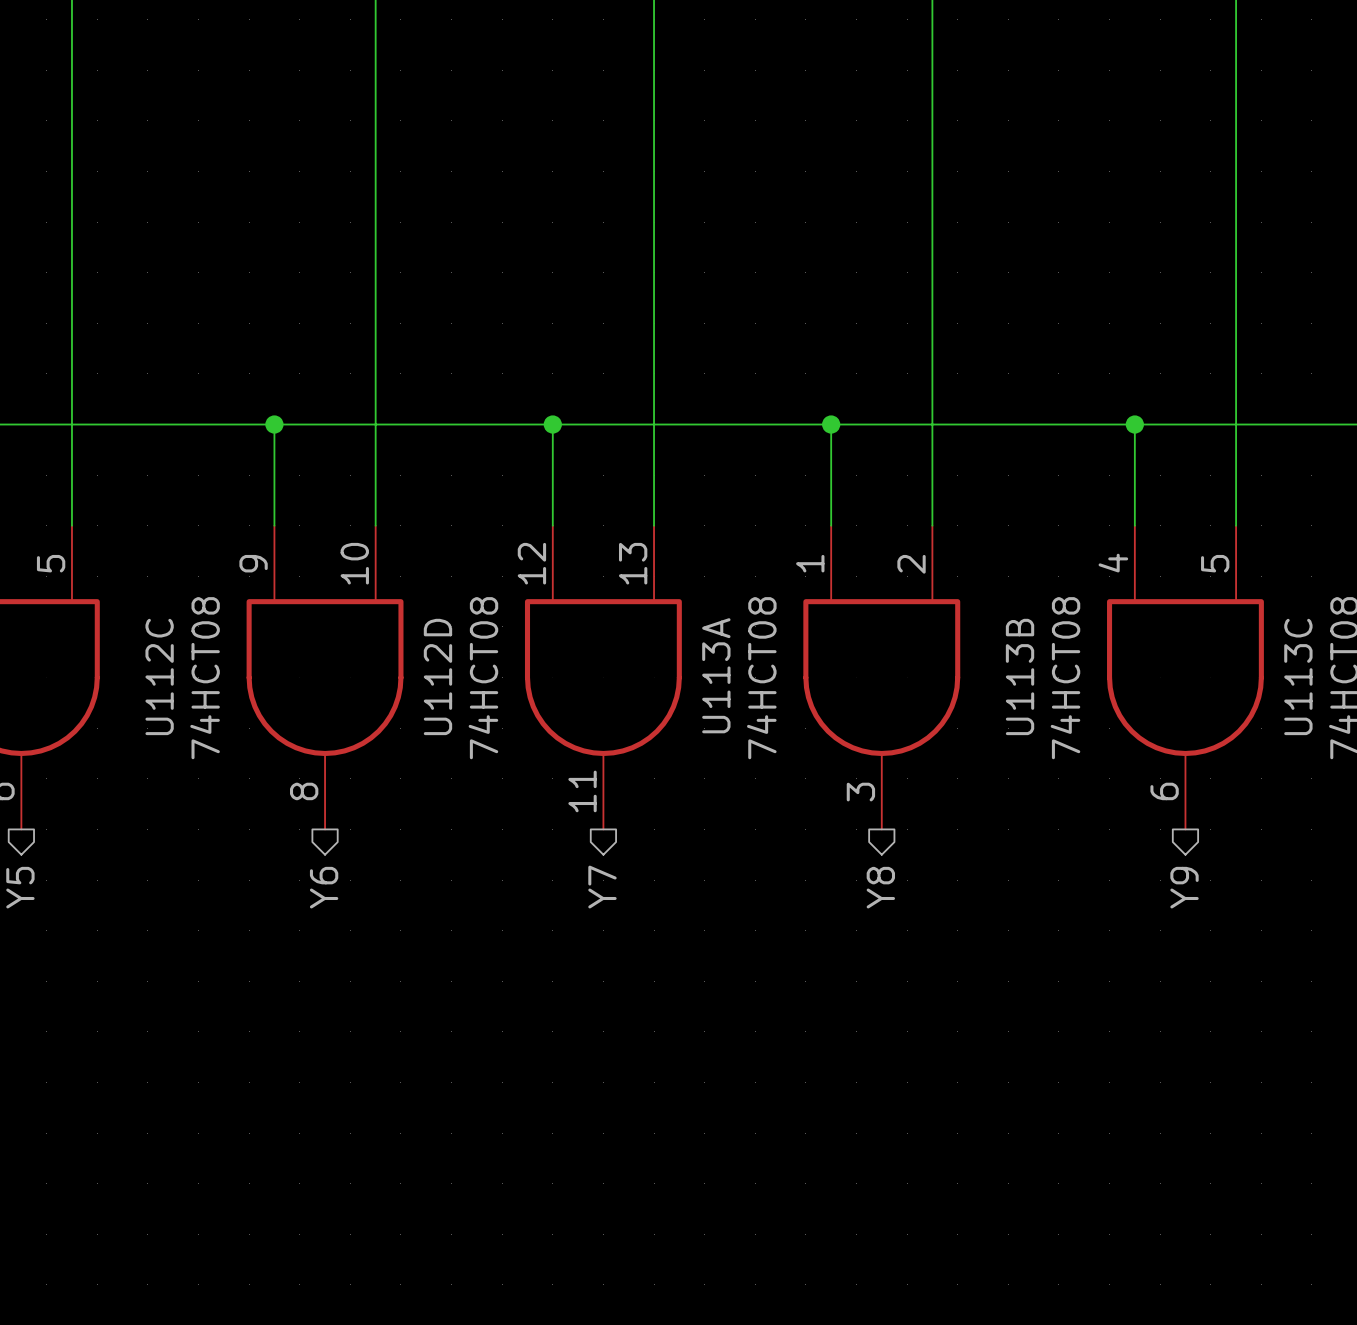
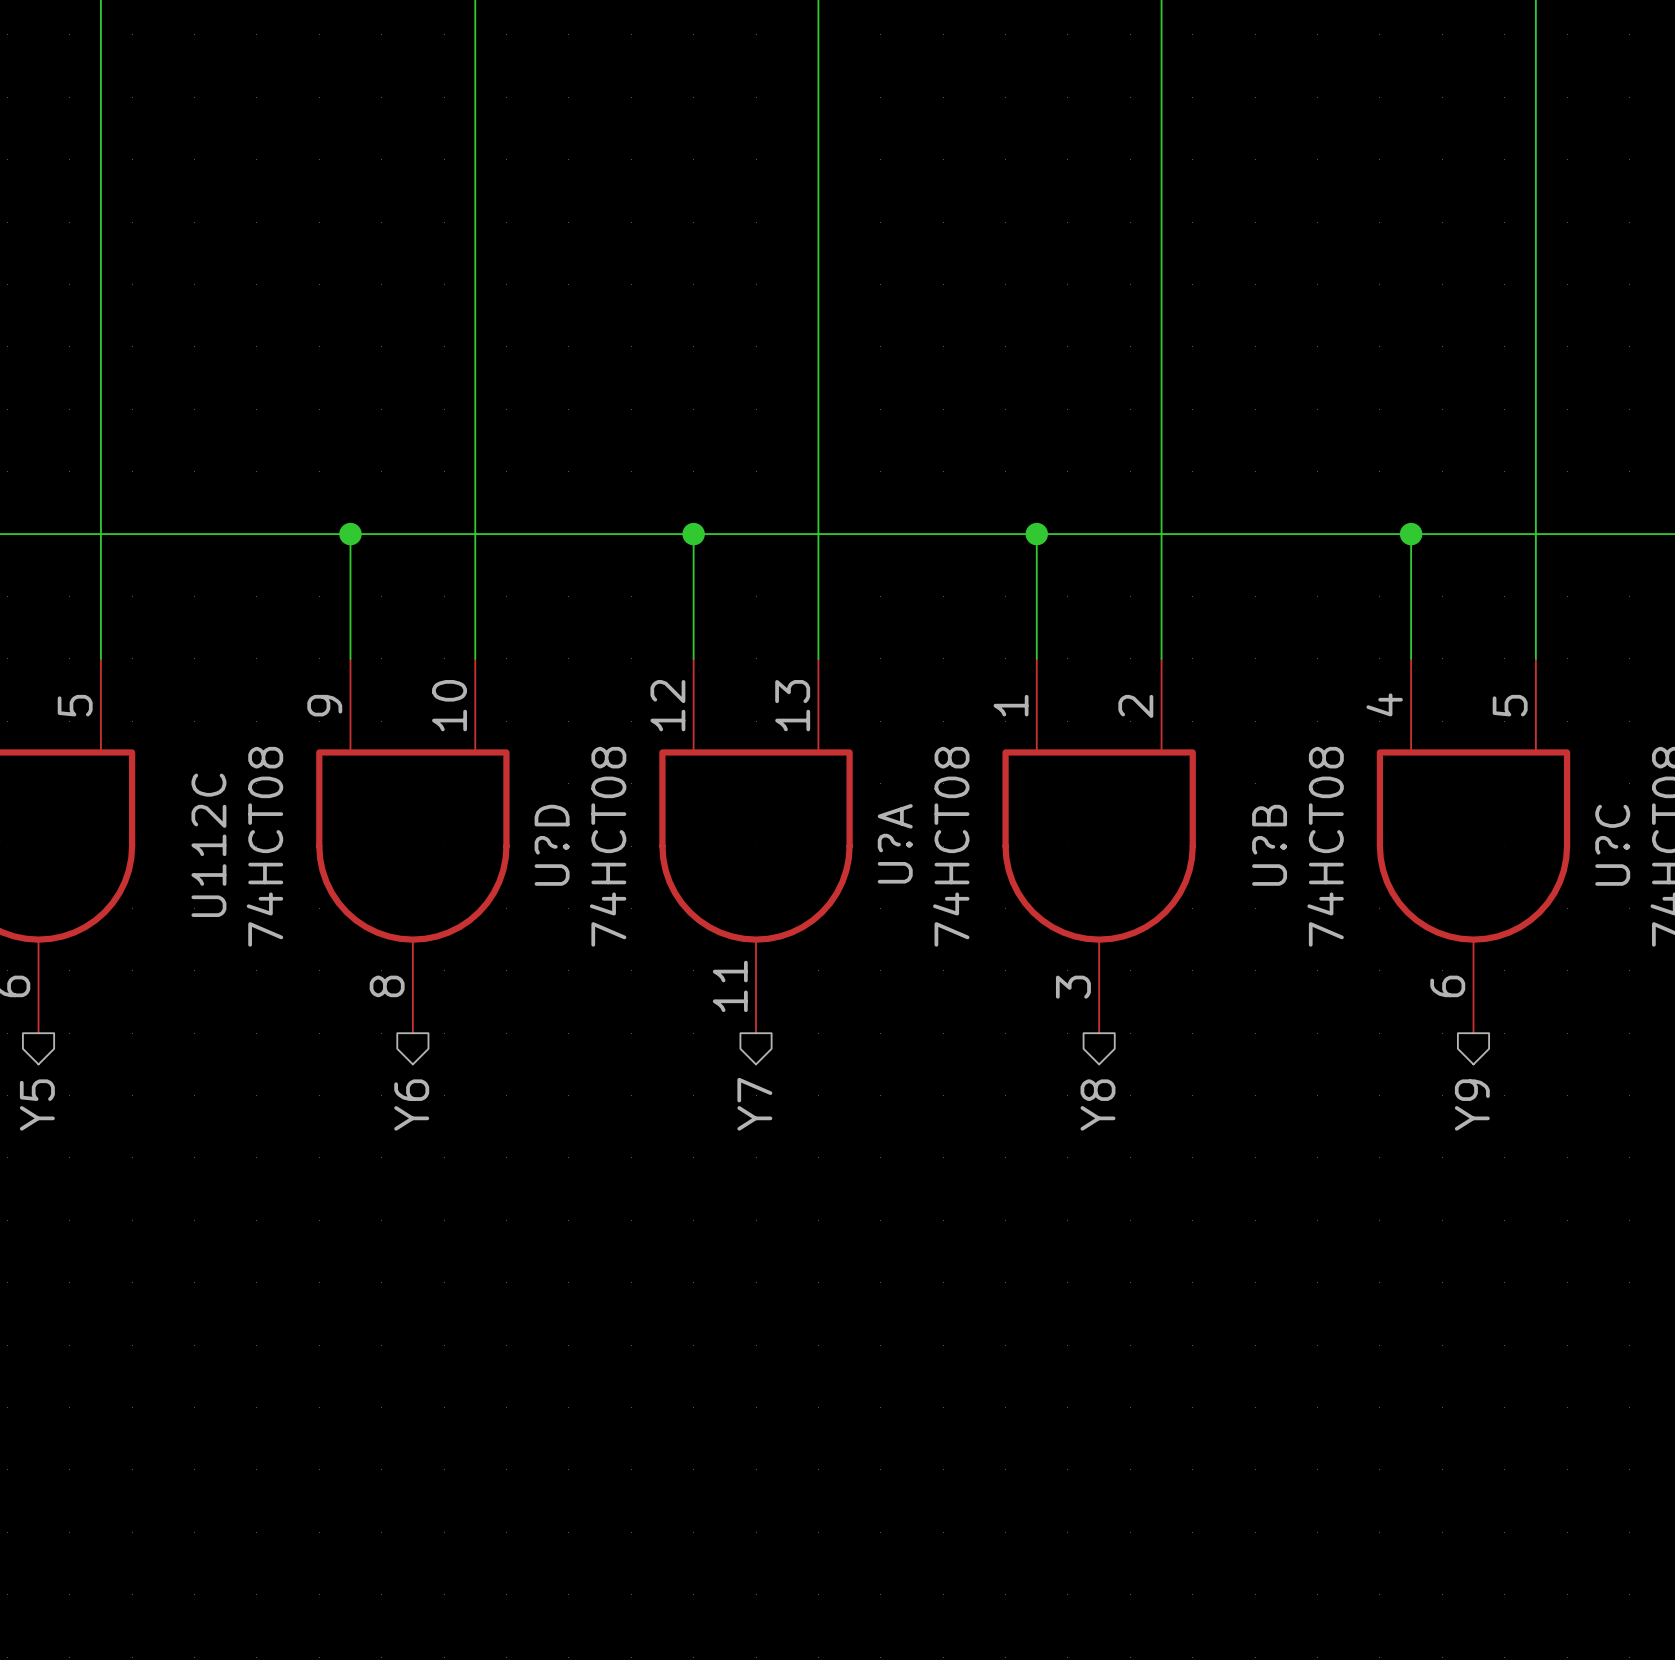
U113A name: U113A (716, 675) -> U?A (895, 843)
U112D name: U112D (437, 676) -> U?D (552, 845)
U113B name: U113B (1020, 676) -> U?B (1269, 845)
U113C name: U113C (1298, 676) -> U?C (1612, 845)

